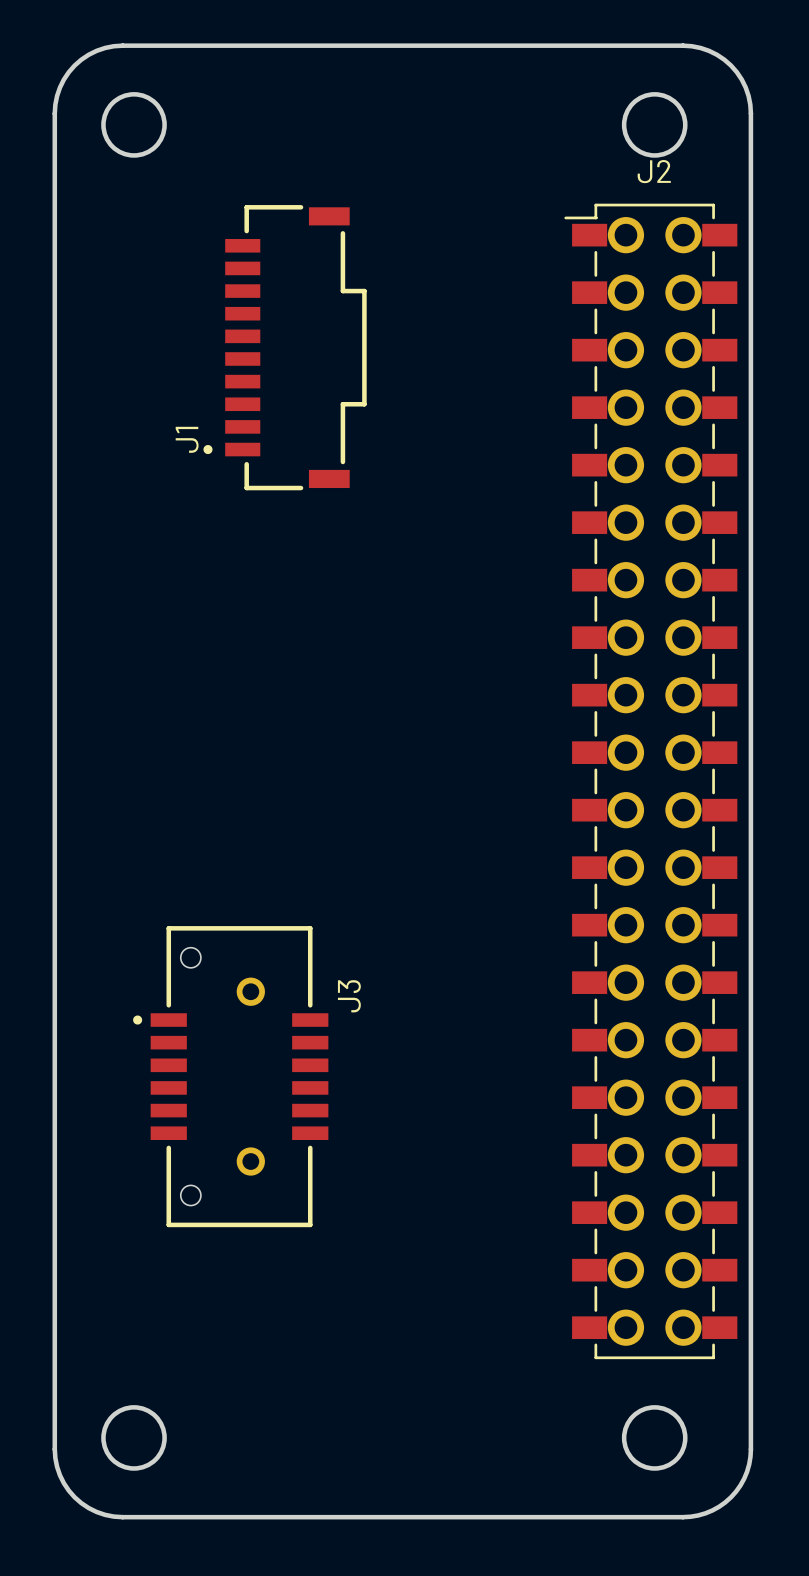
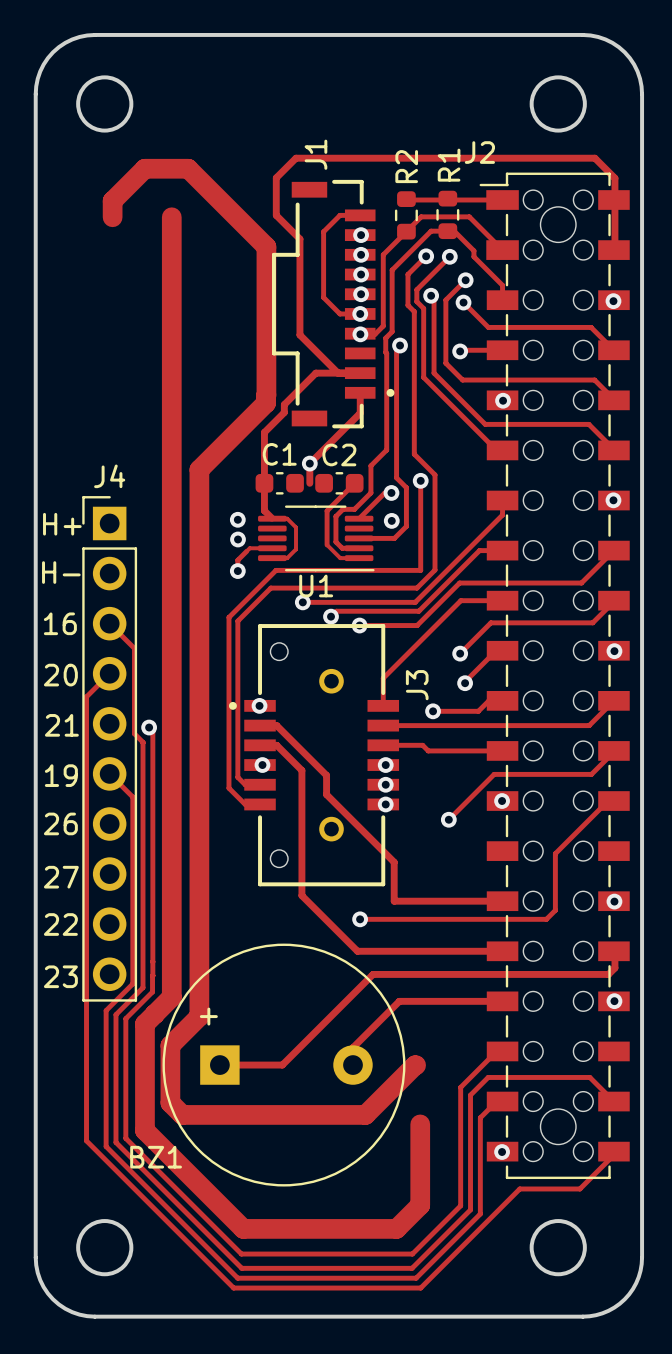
J2 name position: J2 (654, 171) -> J2 (479, 152)
J2 footprint: [564, 203, 738, 1360] -> [479, 172, 630, 1180]
J1 footprint: [203, 205, 367, 491] -> [272, 179, 395, 429]
track: none -> (401, 200) (502, 200)
track: none -> (360, 215) (340, 215) (323, 231) (323, 297) (340, 313) (360, 313)
R2: none -> (406, 215)
R1: none -> (447, 214)
track: none -> (112, 217) (112, 200) (144, 168) (188, 168) (266, 246) (266, 403) (199, 469) (199, 1016) (170, 1045) (170, 1102) (182, 1114) (365, 1114) (416, 1065)
track: none -> (171, 217) (171, 997) (144, 1024) (144, 1130) (243, 1228) (396, 1228) (420, 1205) (420, 1124)
via: none -> (361, 235)
track: none -> (502, 250) (469, 216) (421, 216) (383, 254) (383, 326) (375, 334) (360, 333)
track: none -> (614, 250) (614, 178) (594, 158) (296, 158) (276, 177) (276, 215) (299, 239) (299, 335) (338, 373)
via: none -> (361, 254)
track: none -> (426, 256) (407, 274) (407, 305) (414, 311) (414, 454) (435, 474) (435, 570) (416, 588) (270, 588) (237, 621) (237, 777) (245, 784) (260, 784)
via: none -> (426, 256)
track: none -> (449, 256) (416, 289) (416, 301) (423, 308) (423, 377) (496, 450) (502, 450)
via: none -> (449, 256)
via: none -> (361, 274)
track: none -> (465, 280) (445, 300) (445, 363) (462, 380) (594, 380) (614, 400)
via: none -> (465, 280)
via: none -> (361, 294)
track: none -> (431, 295) (434, 298) (434, 373) (485, 424) (588, 424) (614, 450)
via: none -> (431, 295)
track: none -> (502, 300) (502, 285) (473, 256) (473, 250) (454, 231) (431, 231) (392, 270) (392, 331) (385, 338) (386, 450) (370, 465) (370, 492) (354, 509) (343, 509) (335, 516) (335, 541) (342, 548) (359, 548)
via: none -> (613, 301)
track: none -> (463, 302) (488, 327) (591, 327) (613, 350)
via: none -> (463, 302)
via: none -> (360, 313)
via: none -> (360, 334)
track: none -> (400, 345) (396, 348) (396, 477) (406, 487) (406, 526) (394, 538) (359, 538)
via: none -> (400, 345)
track: none -> (501, 350) (460, 351)
via: none -> (460, 351)
track: none -> (360, 373) (315, 373) (284, 404) (284, 412) (264, 432) (264, 510) (271, 518)
J1 name position: J1 (187, 439) -> J1 (315, 154)
track: none -> (360, 392) (360, 413) (309, 463) (309, 483)
via: none -> (503, 400)
via: none -> (309, 463)
track: none -> (420, 480) (420, 570) (275, 570) (228, 617) (228, 788) (245, 804) (260, 804)
via: none -> (420, 480)
C1: none -> (279, 483)
C2: none -> (339, 483)
track: none -> (354, 483) (327, 510) (327, 544) (340, 558) (359, 558)
track: none -> (391, 492) (384, 492) (359, 518)
via: none -> (391, 492)
via: none -> (613, 500)
track: none -> (502, 500) (502, 515) (415, 602) (302, 602)
track: none -> (272, 518) (287, 518) (296, 527) (296, 549) (287, 558) (272, 558)
via: none -> (237, 519)
via: none -> (391, 520)
text: none -> H+ (62, 524)
U1: none -> (316, 538)
via: none -> (237, 539)
track: none -> (272, 548) (249, 548) (237, 560) (237, 571)
track: none -> (502, 550) (479, 550) (418, 611) (336, 611) (331, 616)
track: none -> (613, 550) (581, 583) (459, 583) (417, 625) (359, 625)
via: none -> (237, 571)
text: none -> H- (61, 572)
track: none -> (501, 600) (460, 600) (383, 678) (383, 705)
track: none -> (614, 600) (592, 622) (490, 622) (460, 653)
via: none -> (302, 602)
via: none -> (331, 616)
text: none -> 16 (60, 623)
track: none -> (109, 623) (134, 648) (134, 733) (143, 742) (142, 987) (115, 1014) (115, 1142) (241, 1268) (412, 1268) (470, 1209) (470, 1095) (488, 1077) (589, 1077) (613, 1101)
via: none -> (359, 625)
track: none -> (501, 650) (496, 650) (465, 683)
via: none -> (614, 651)
via: none -> (460, 653)
track: none -> (109, 673) (86, 696) (86, 1140) (233, 1288) (420, 1288) (519, 1188) (579, 1188) (613, 1154) (613, 1151)
text: none -> 20 (60, 675)
via: none -> (465, 683)
track: none -> (501, 700) (488, 700) (478, 711) (433, 711)
track: none -> (613, 700) (589, 725) (383, 725)
via: none -> (259, 705)
via: none -> (433, 711)
text: none -> 21 (61, 725)
track: none -> (260, 725) (276, 725) (326, 775) (326, 794) (394, 862) (394, 901) (501, 901)
track: none -> (149, 727) (152, 731) (152, 992) (125, 1018) (125, 1138) (241, 1254) (412, 1254) (460, 1205) (460, 1087) (496, 1051) (502, 1051)
via: none -> (149, 727)
track: none -> (260, 745) (276, 745) (301, 770) (301, 895) (357, 951) (501, 951)
track: none -> (383, 745) (422, 745) (428, 750) (501, 750)
J4: none -> (109, 748)
track: none -> (614, 750) (591, 774) (494, 774) (448, 819)
via: none -> (262, 765)
via: none -> (385, 765)
track: none -> (109, 773) (132, 797) (132, 983) (106, 1010) (106, 1146) (237, 1278) (416, 1278) (480, 1213) (480, 1117) (496, 1101) (502, 1101)
text: none -> 19 (61, 775)
via: none -> (385, 784)
via: none -> (502, 801)
track: none -> (613, 801) (608, 801) (555, 853) (555, 910) (546, 919) (360, 919)
via: none -> (385, 804)
via: none -> (448, 819)
text: none -> 26 (60, 823)
text: none -> 27 (61, 877)
via: none -> (614, 901)
via: none -> (360, 919)
text: none -> 22 (60, 924)
J3 position: (230, 1076) -> (314, 755)
track: none -> (614, 951) (614, 968) (608, 974) (373, 974) (282, 1065) (219, 1065)
text: none -> 23 (60, 976)
via: none -> (614, 1001)
track: none -> (501, 1001) (399, 1001) (353, 1047) (353, 1065)
BZ1: none -> (283, 1065)
via: none -> (502, 1152)

